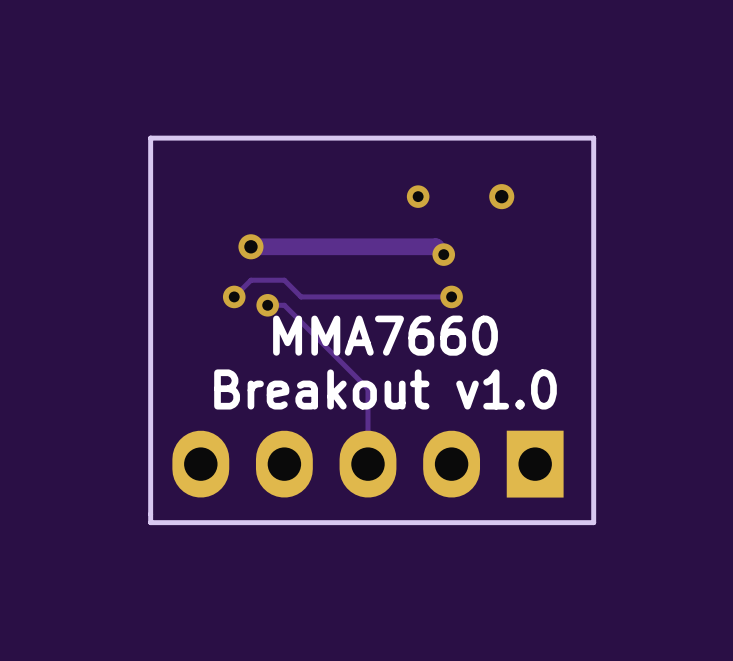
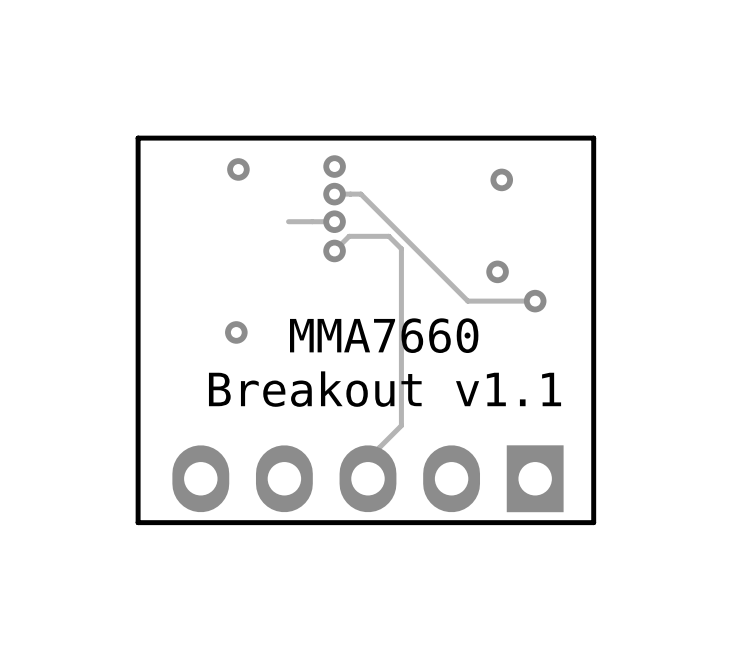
board edge: (150, 138) (150, 522) -> (150, 138) (138, 138) (138, 522) (150, 522)
via: none -> (334, 166)
via: none -> (238, 169)
track: none -> (334, 194) (360, 194) (467, 301) (535, 301)
via: none -> (334, 194)
via: (418, 196) -> none
via position: (501, 196) -> (501, 179)
track: none -> (334, 221) (288, 221)
via: none -> (334, 221)
track: (250, 246) (435, 246) (443, 254) -> none
via: (250, 246) -> none
via: none -> (334, 250)
via: (443, 254) -> none
via: none -> (497, 271)
via: (234, 296) -> none
track: (451, 296) (301, 296) (284, 280) (250, 280) (234, 296) -> none
via: (451, 296) -> none
via: none -> (535, 301)
track: (267, 305) (284, 305) (367, 388) (367, 459) -> (334, 250) (349, 236) (388, 236) (401, 248) (401, 425) (367, 459)
via: (267, 305) -> none
via: none -> (236, 332)
text: Breakout v1.0 (385, 389) -> Breakout v1.1 (385, 389)
part position: (367, 464) -> (367, 478)

